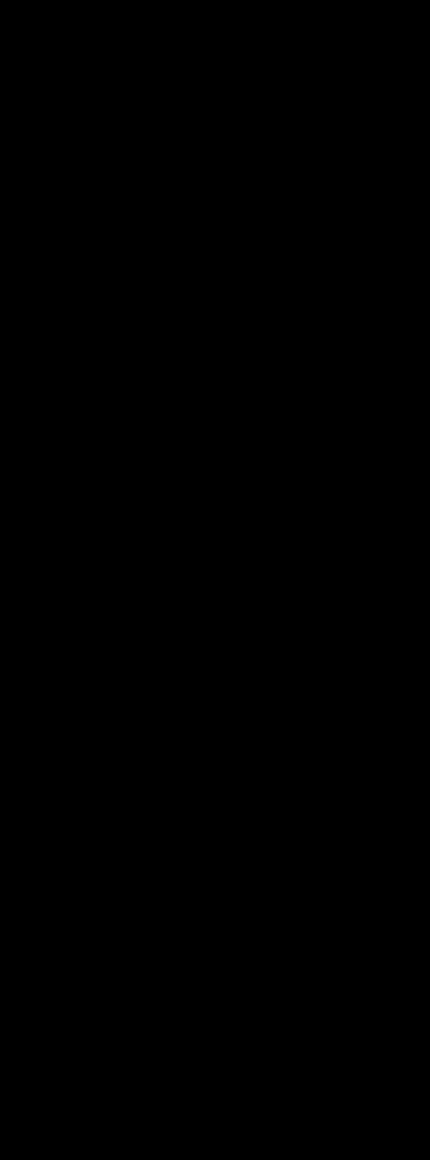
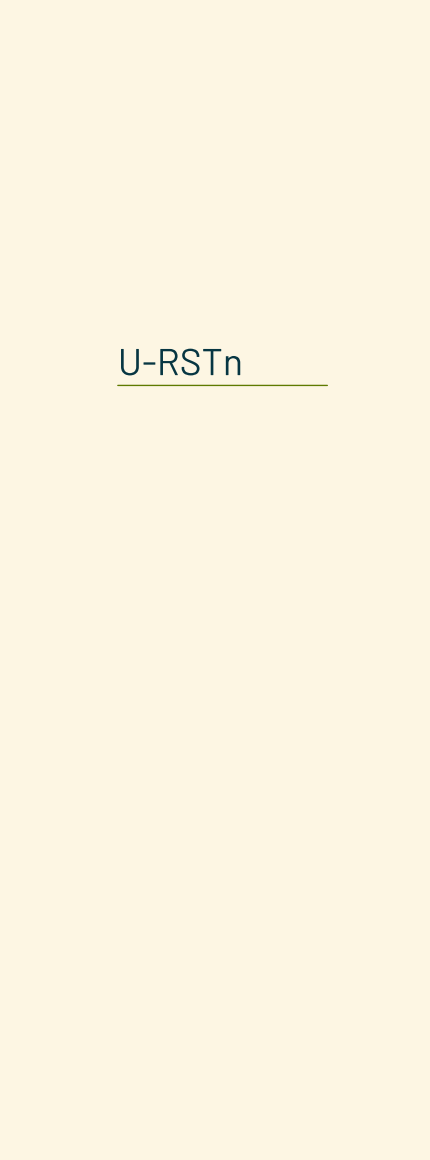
label: none -> U-RSTn (180, 362)
wire: none -> (117, 385) (327, 385)

